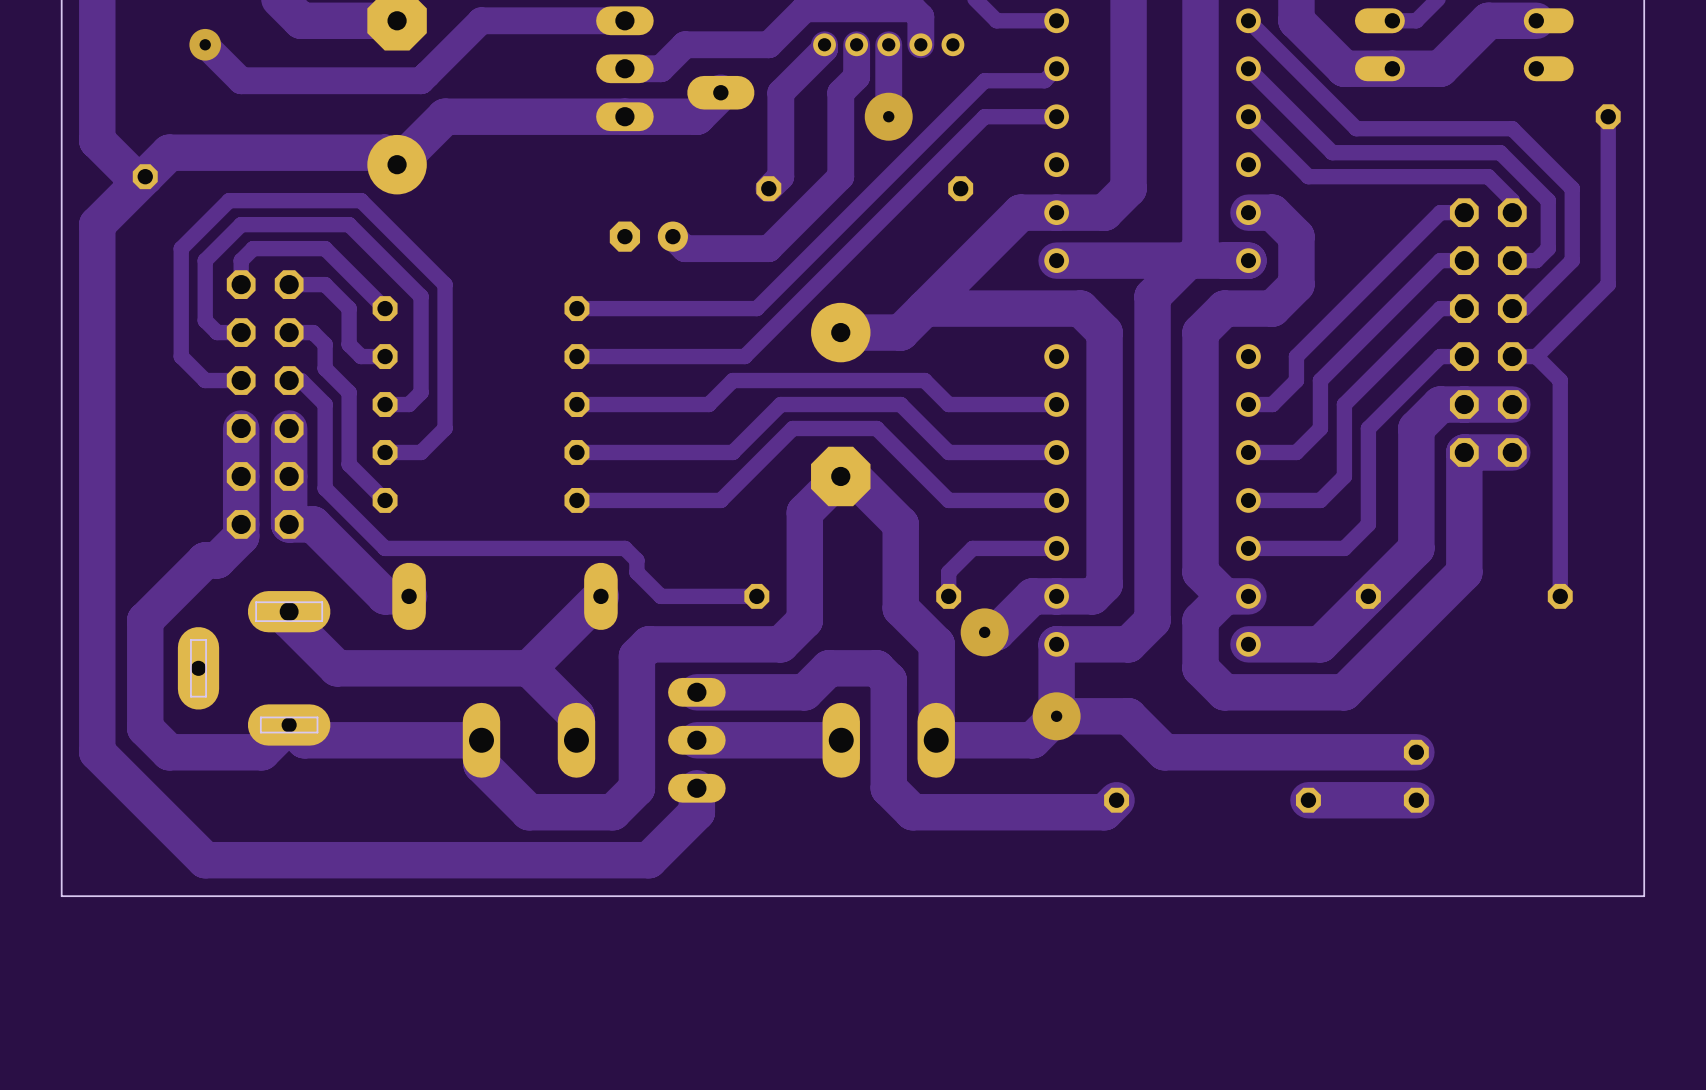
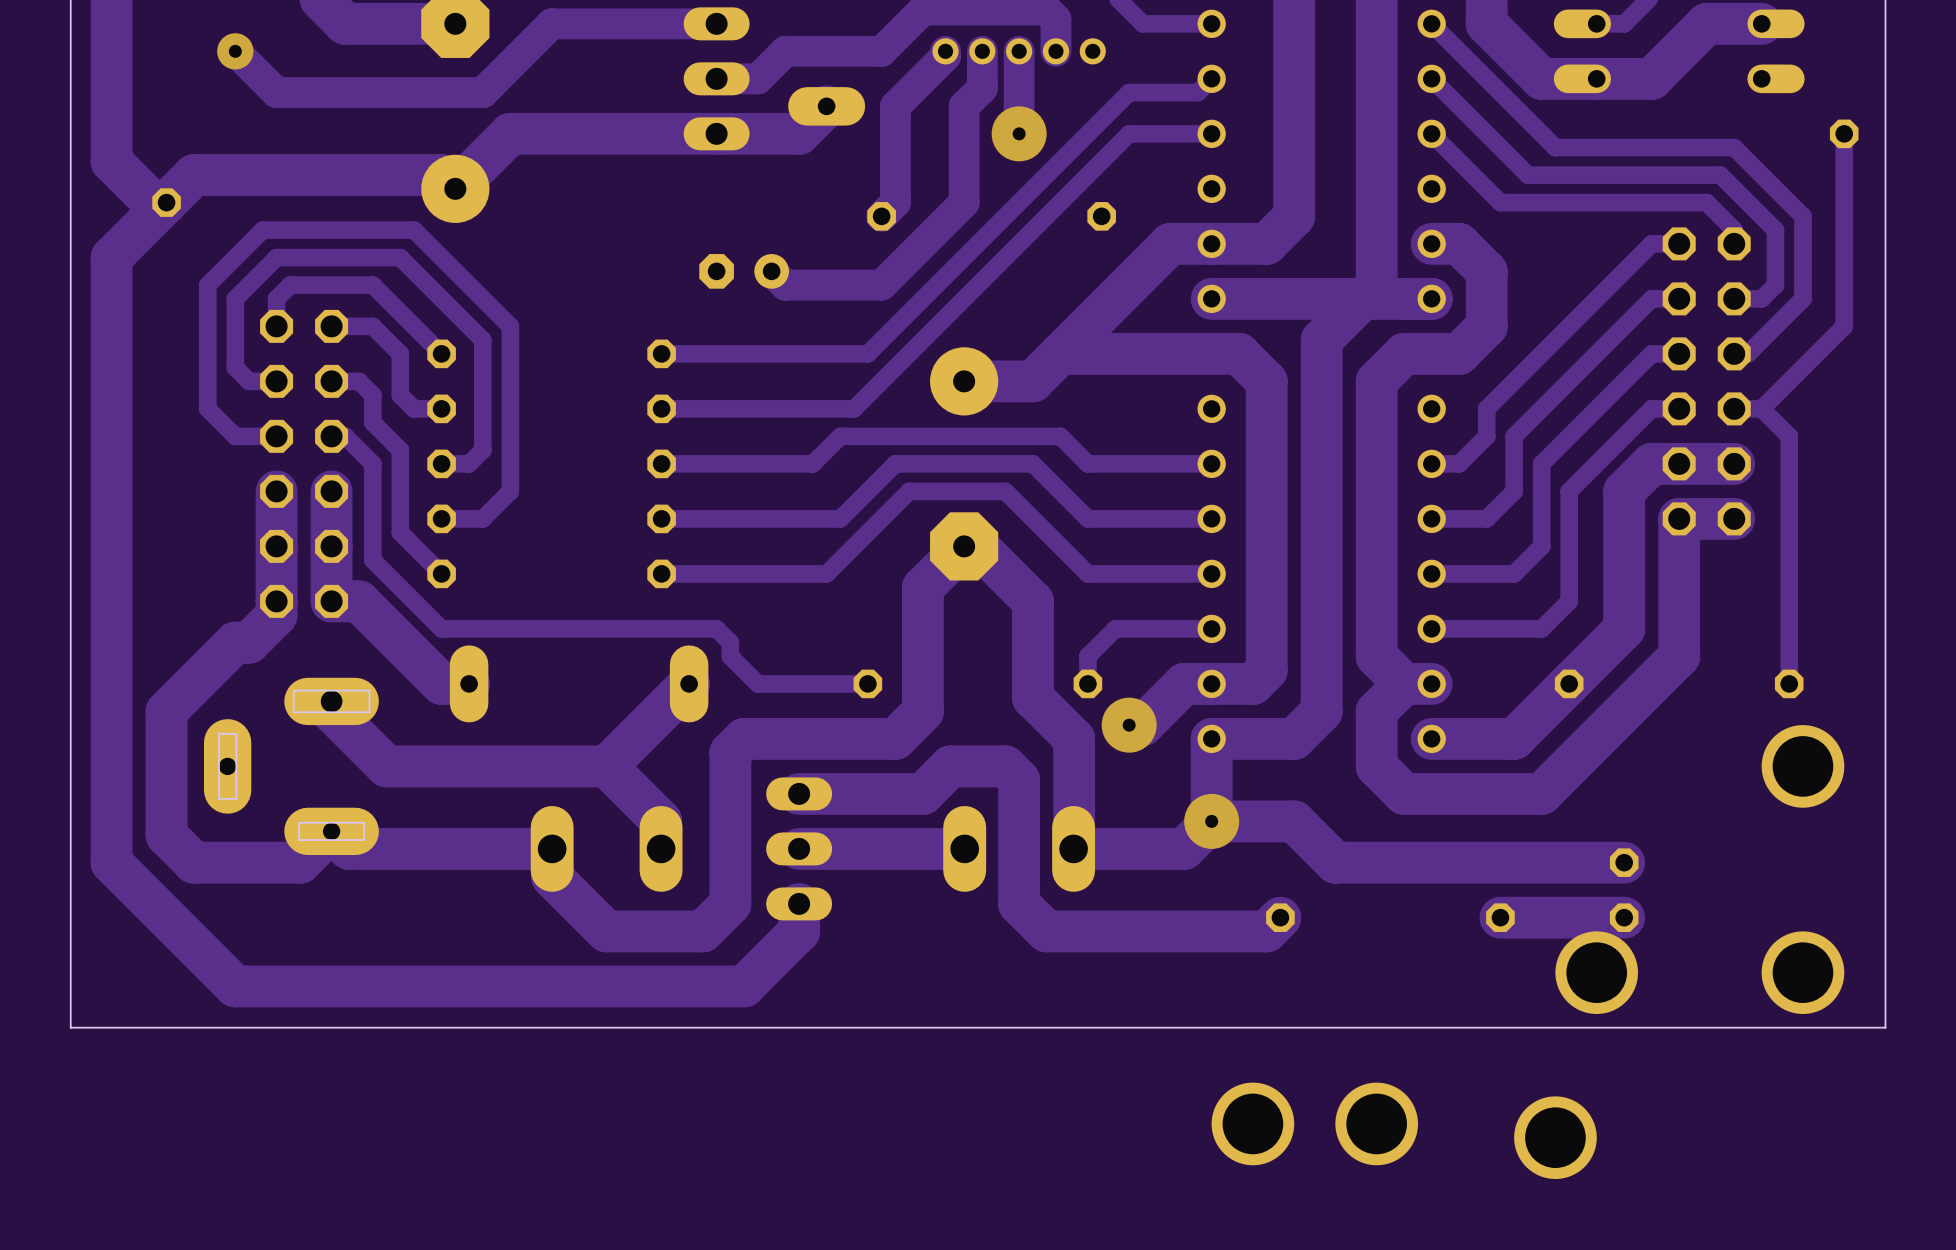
part: none -> (1802, 766)
part: none -> (1596, 972)
part: none -> (1802, 972)
part: none -> (1252, 1123)
part: none -> (1376, 1123)
part: none -> (1555, 1137)

